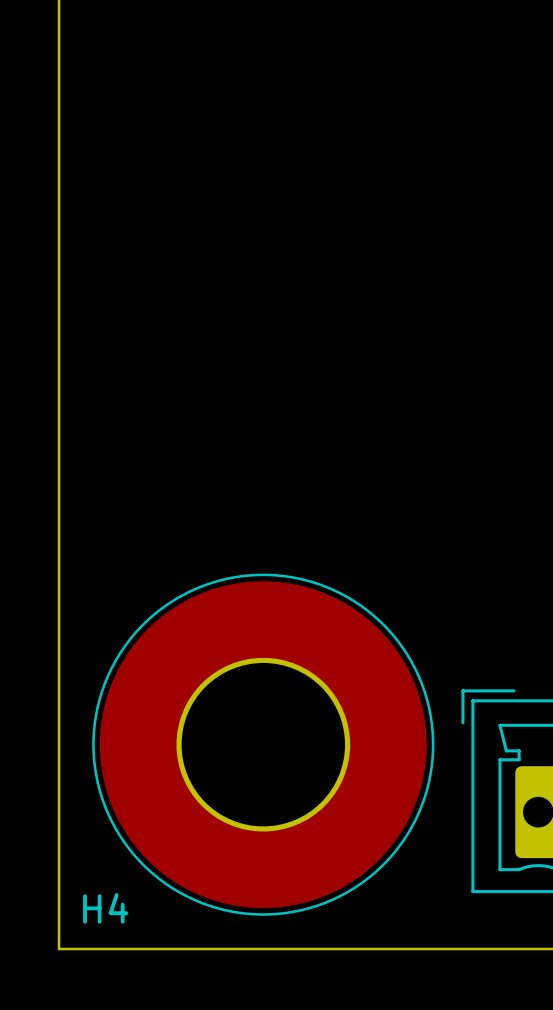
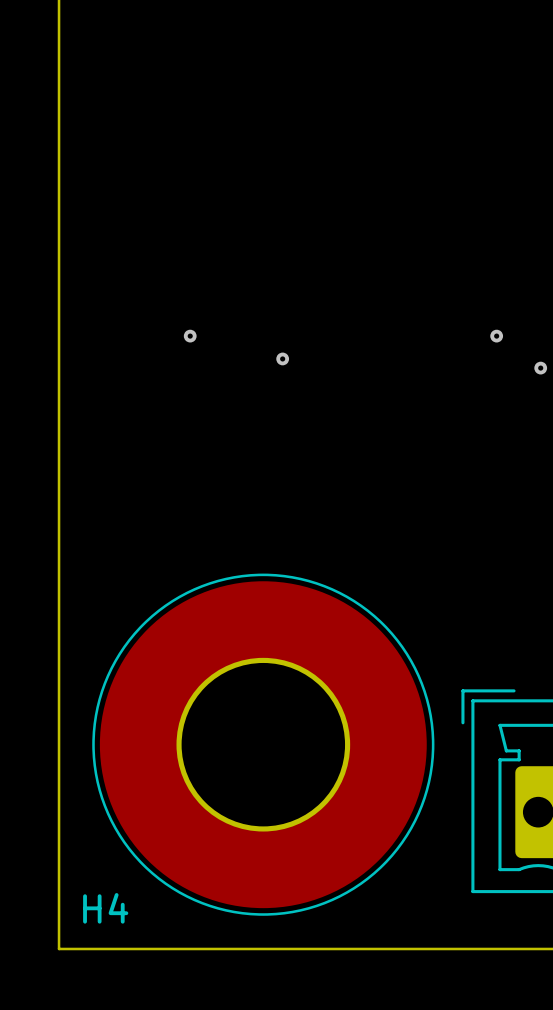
via: none -> (190, 336)
via: none -> (496, 336)
via: none -> (282, 358)
via: none -> (540, 368)

